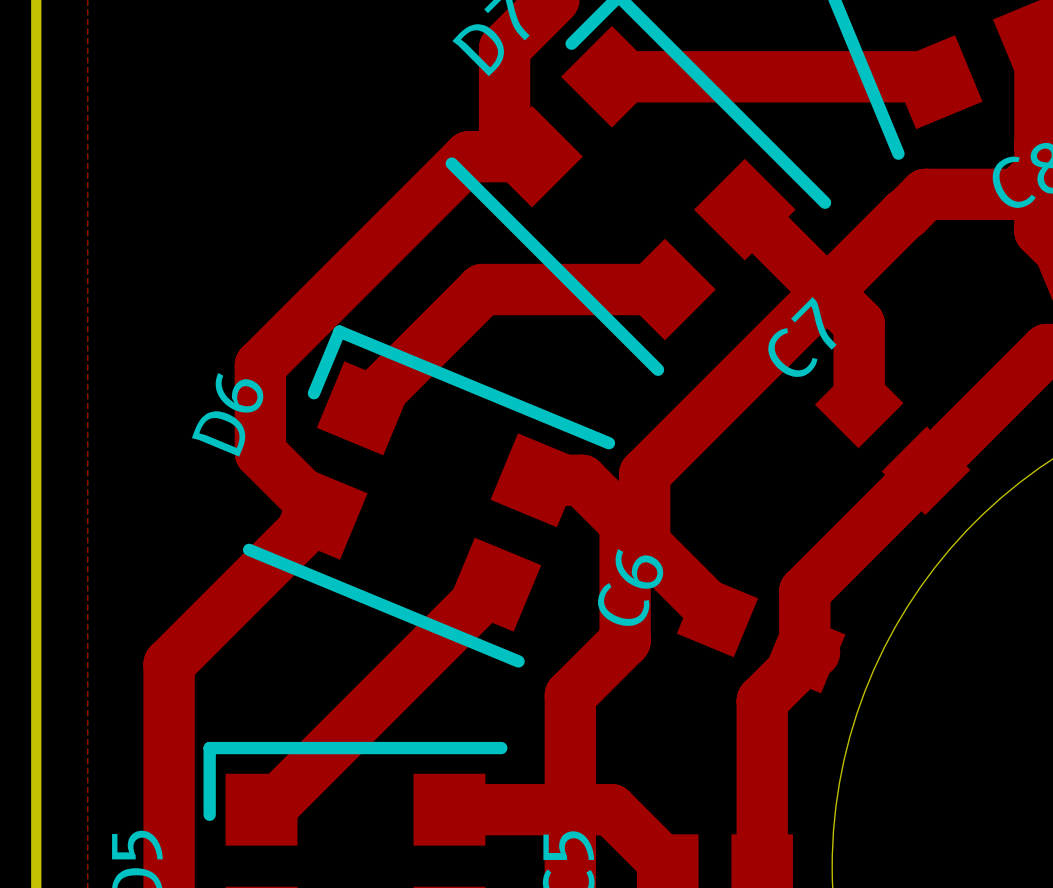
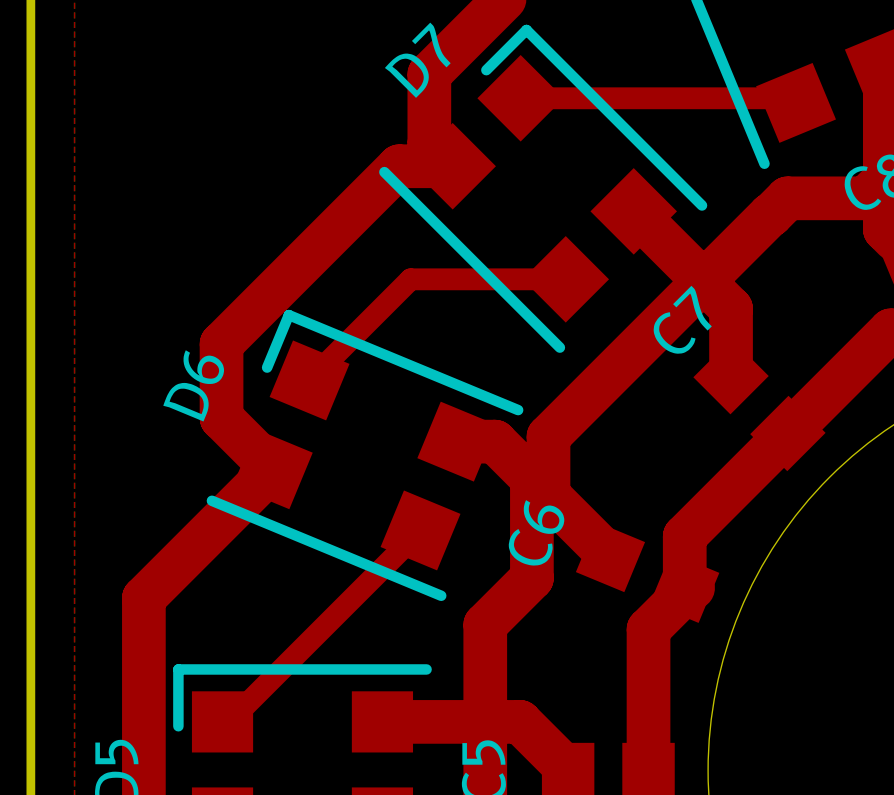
top track width: thick (611, 76) (930, 76) (935, 82) -> thin (520, 98) (791, 98) (796, 102)
top track width: thick (664, 289) (482, 289) (363, 408) -> thin (565, 279) (410, 279) (309, 380)
top track width: thick (494, 584) (269, 809) (261, 809) -> thin (420, 530) (229, 721) (222, 721)

